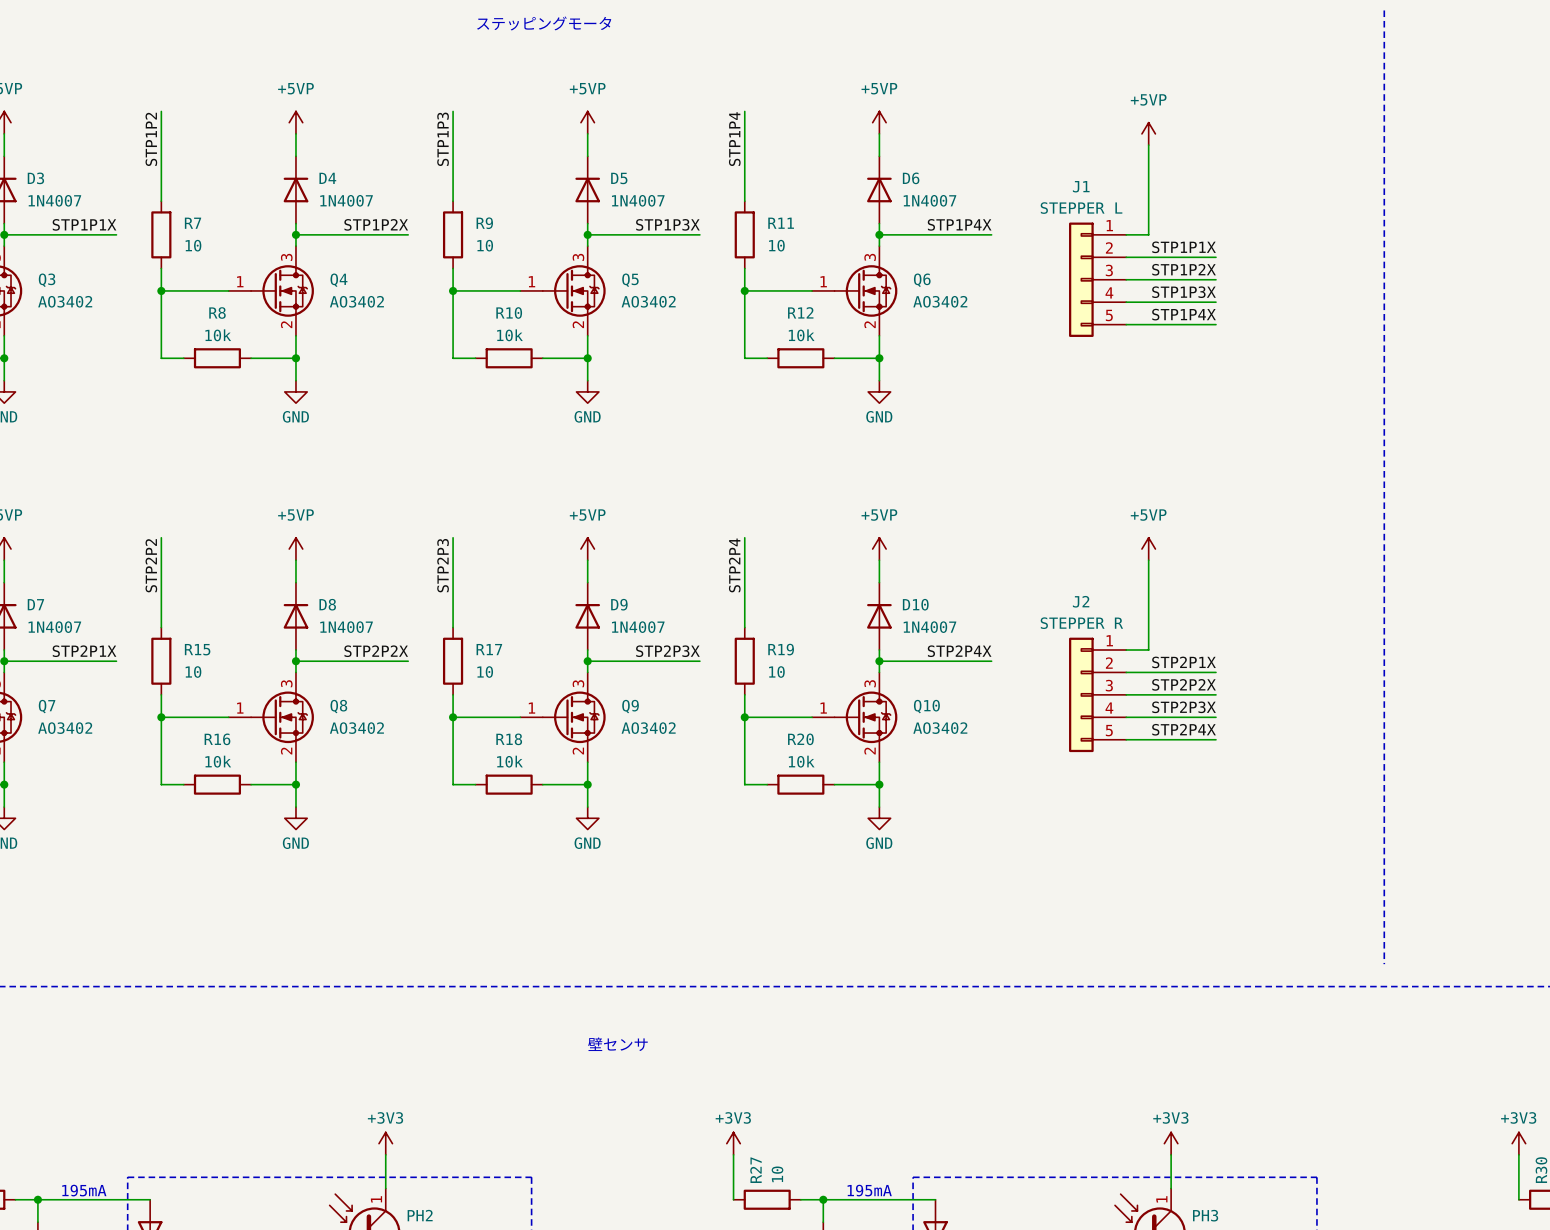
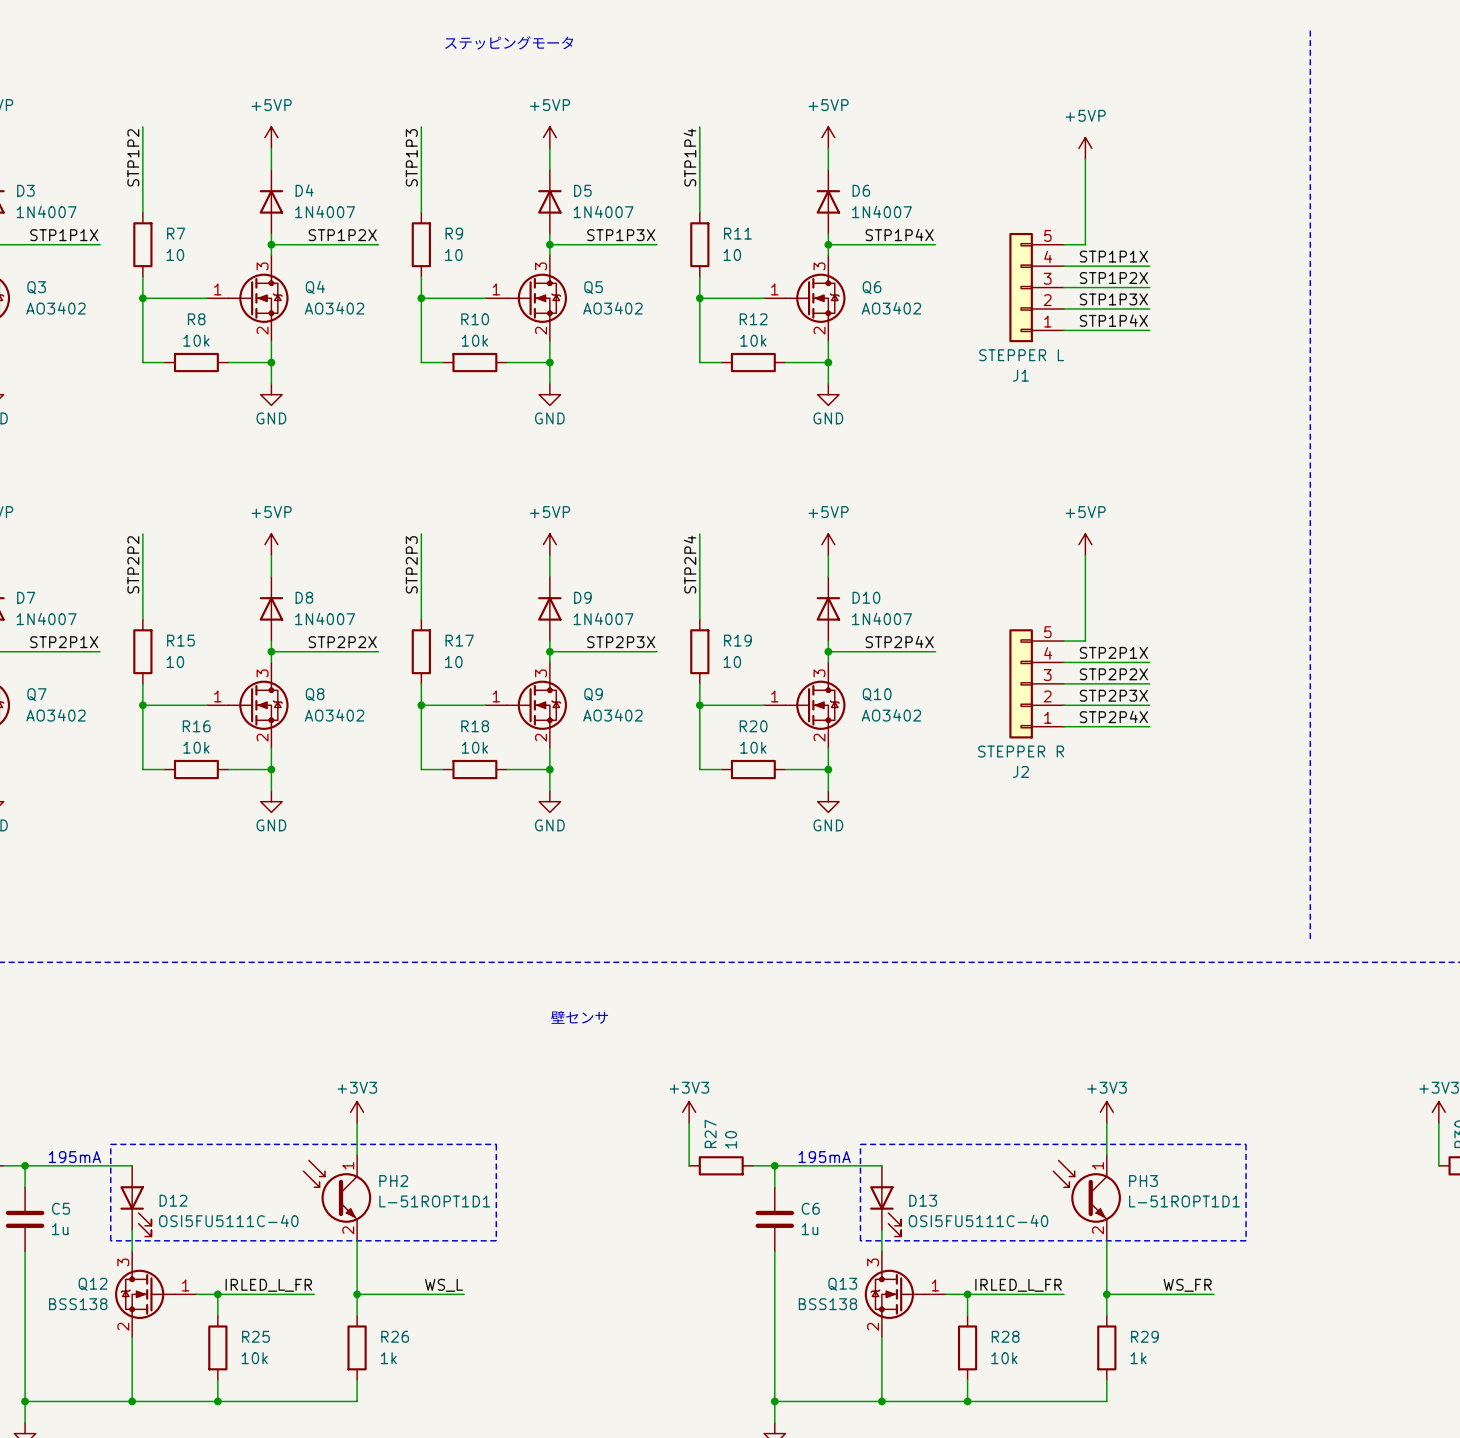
J1 flip: as is (1081, 279) -> up-down (1021, 287)
J2 flip: as is (1081, 694) -> up-down (1021, 683)

